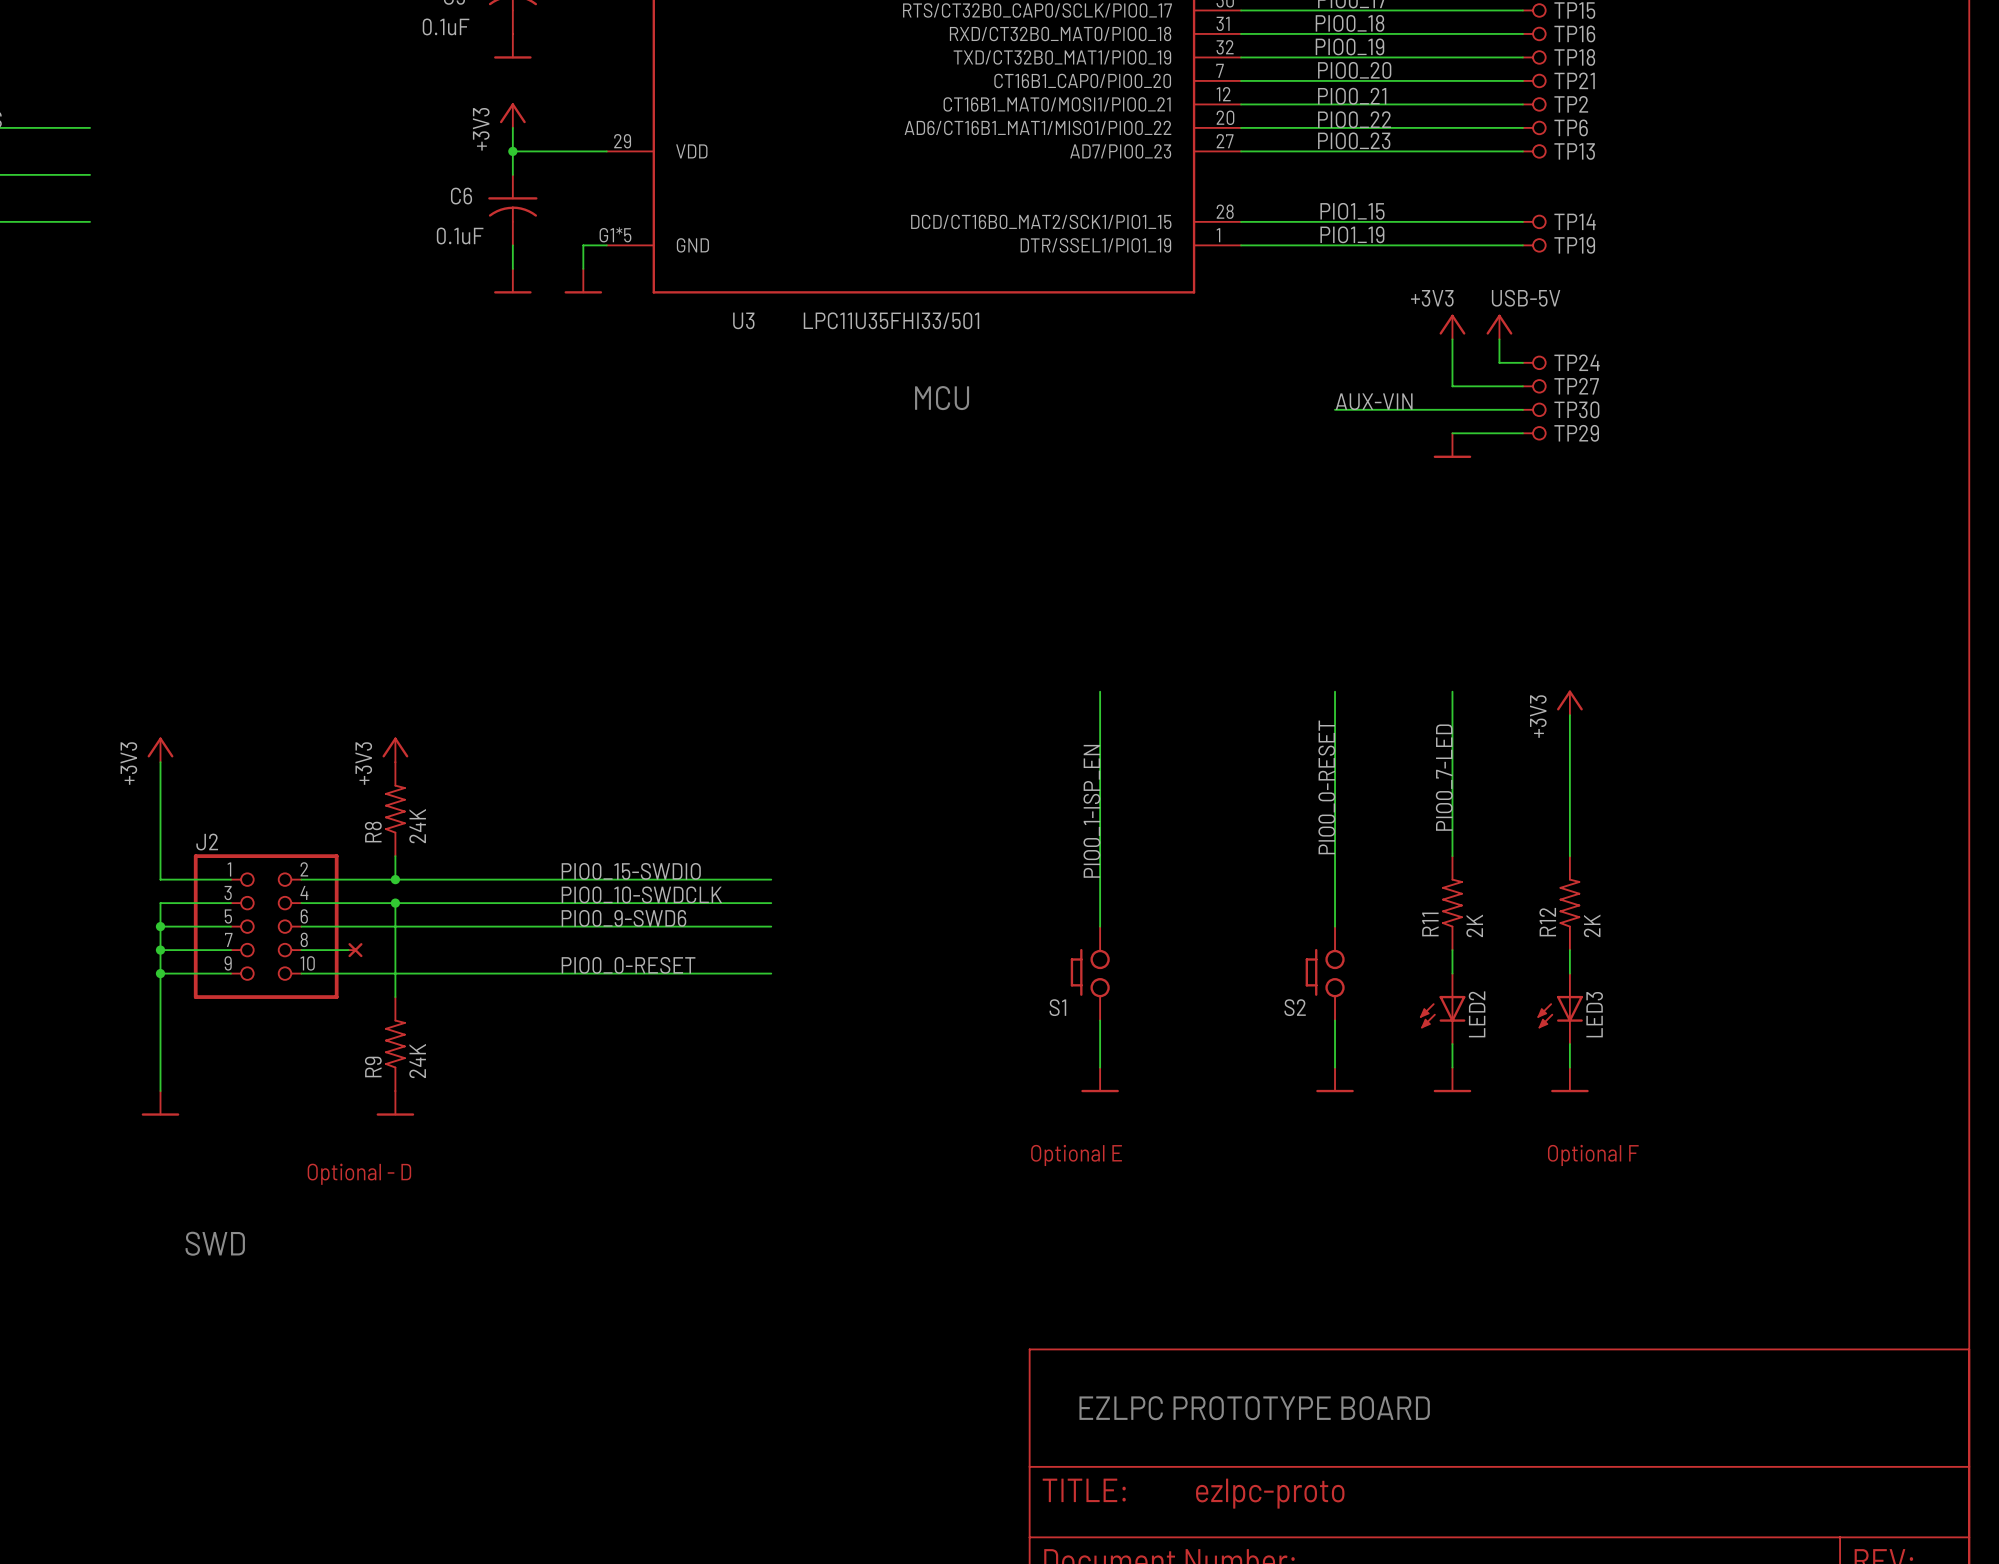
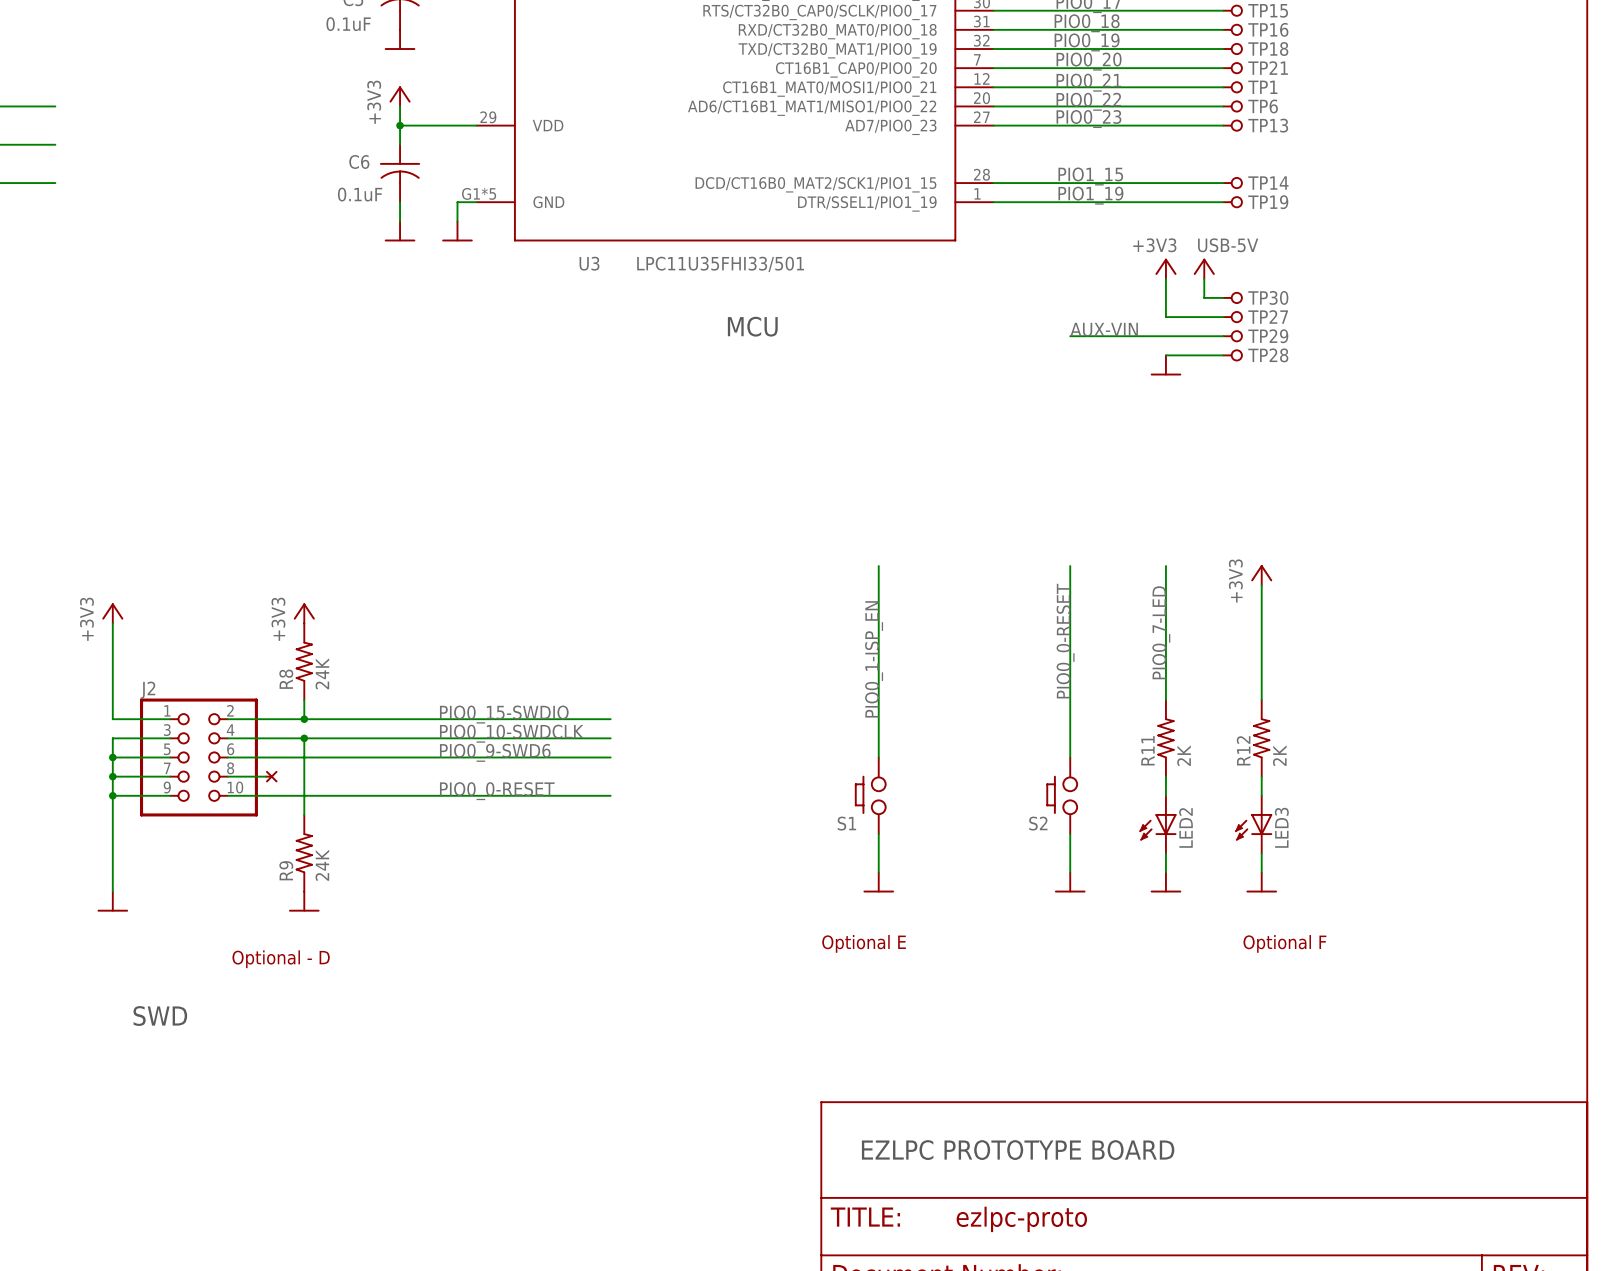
TP2 name: TP2 (1571, 104) -> TP1 (1262, 87)
TP24 name: TP24 (1577, 362) -> TP30 (1268, 297)
TP30 name: TP30 (1576, 409) -> TP29 (1268, 336)
TP29 name: TP29 (1576, 433) -> TP28 (1268, 355)

